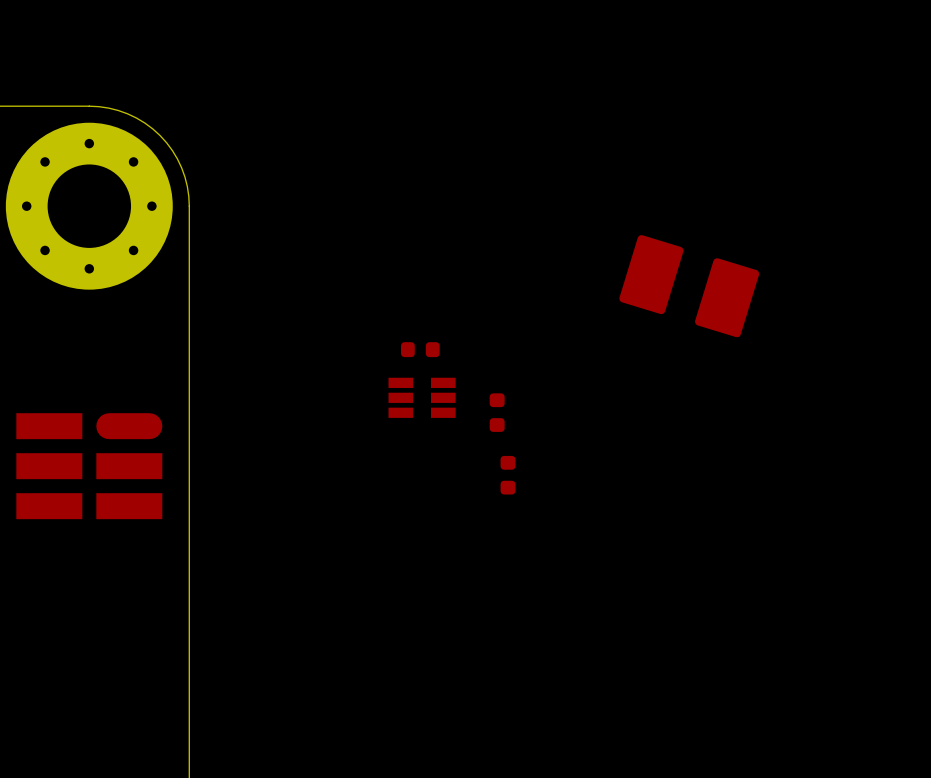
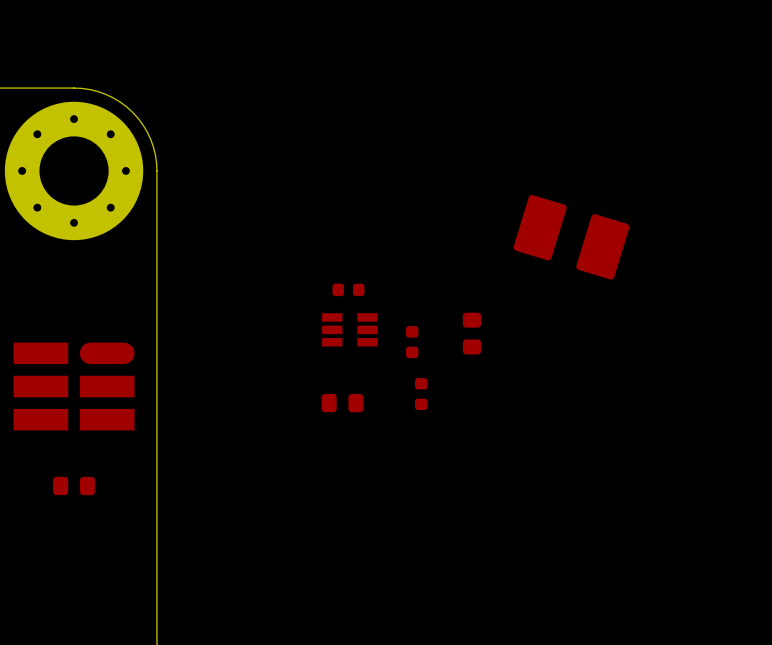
part: none -> (471, 333)
part: none -> (342, 403)
part: none -> (74, 486)

